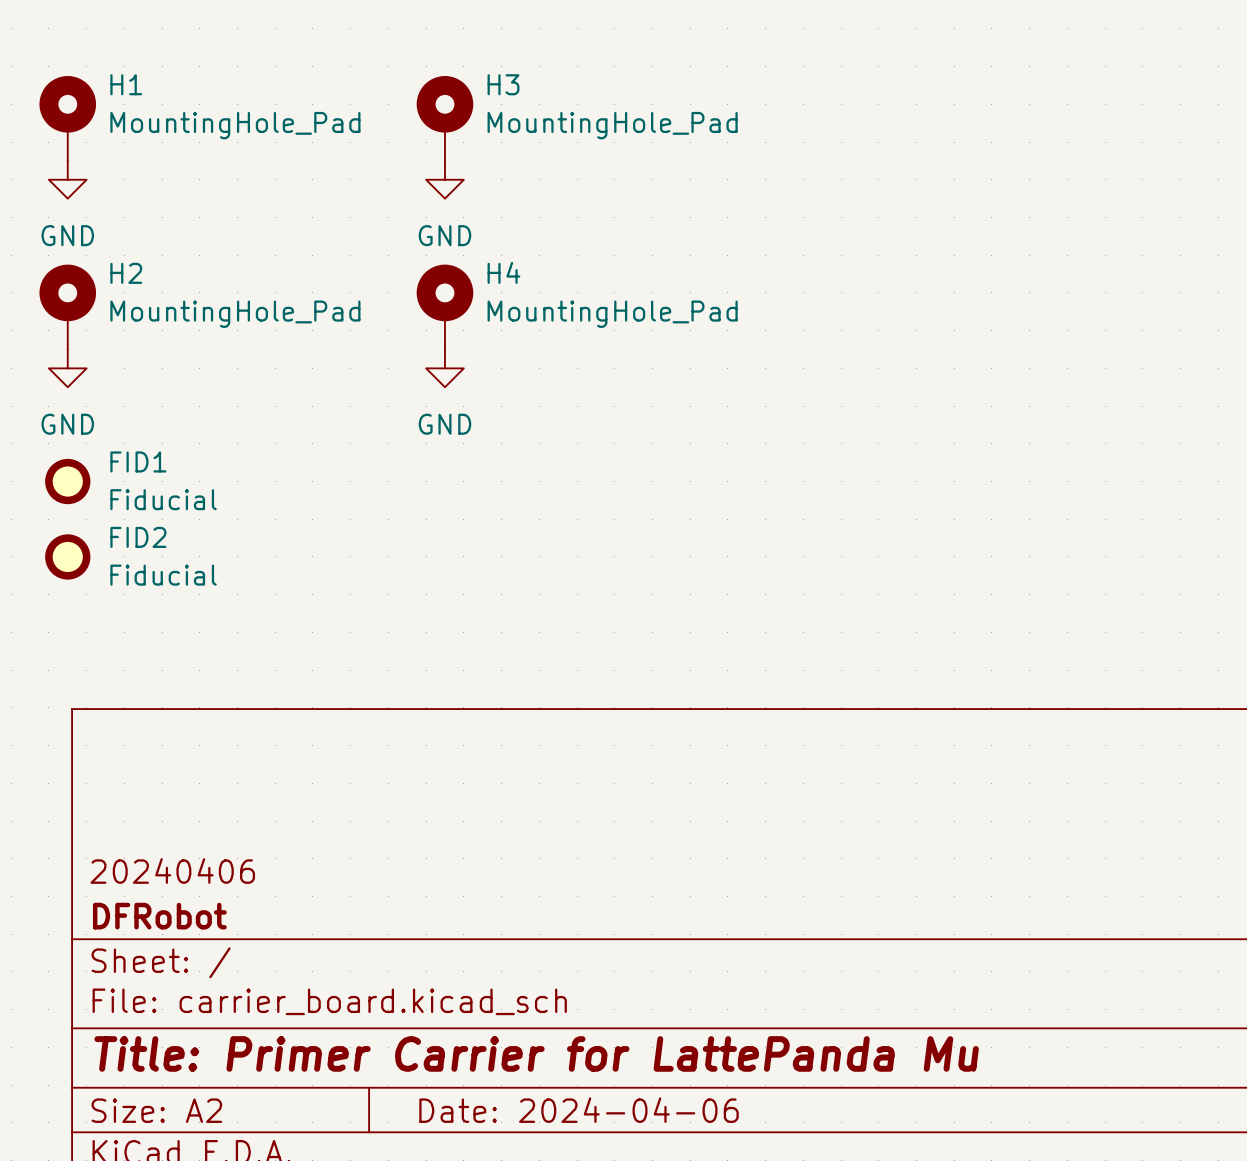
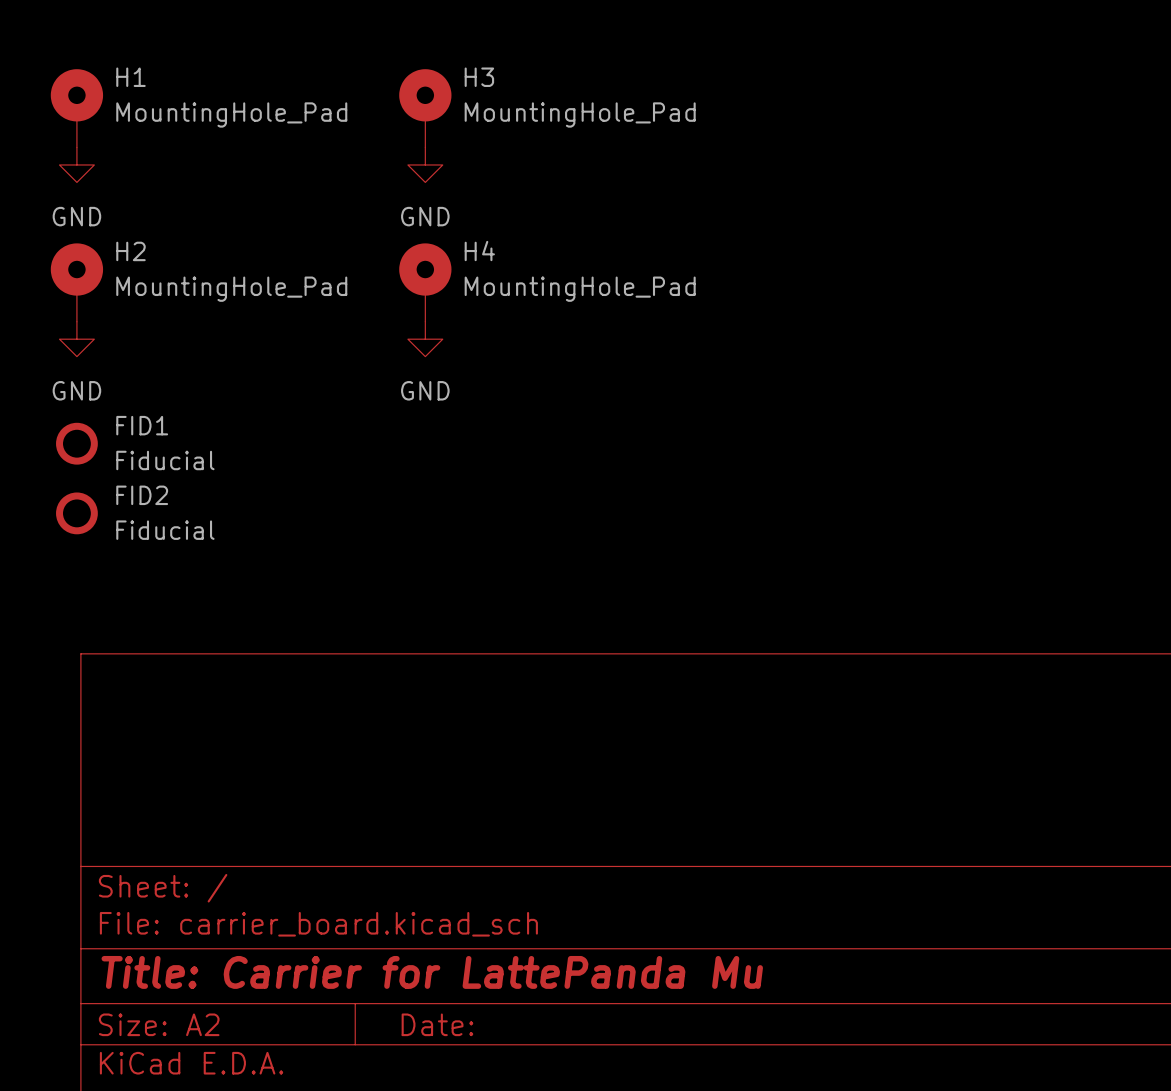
title block: 20240406 (172, 871) -> none
title block: DFRobot (159, 916) -> none
title block: Title: Primer Carrier for LattePanda Mu (536, 1053) -> Title: Carrier for LattePanda Mu (432, 972)
title block: Date: 2024-04-06 (579, 1110) -> Date: (437, 1024)

